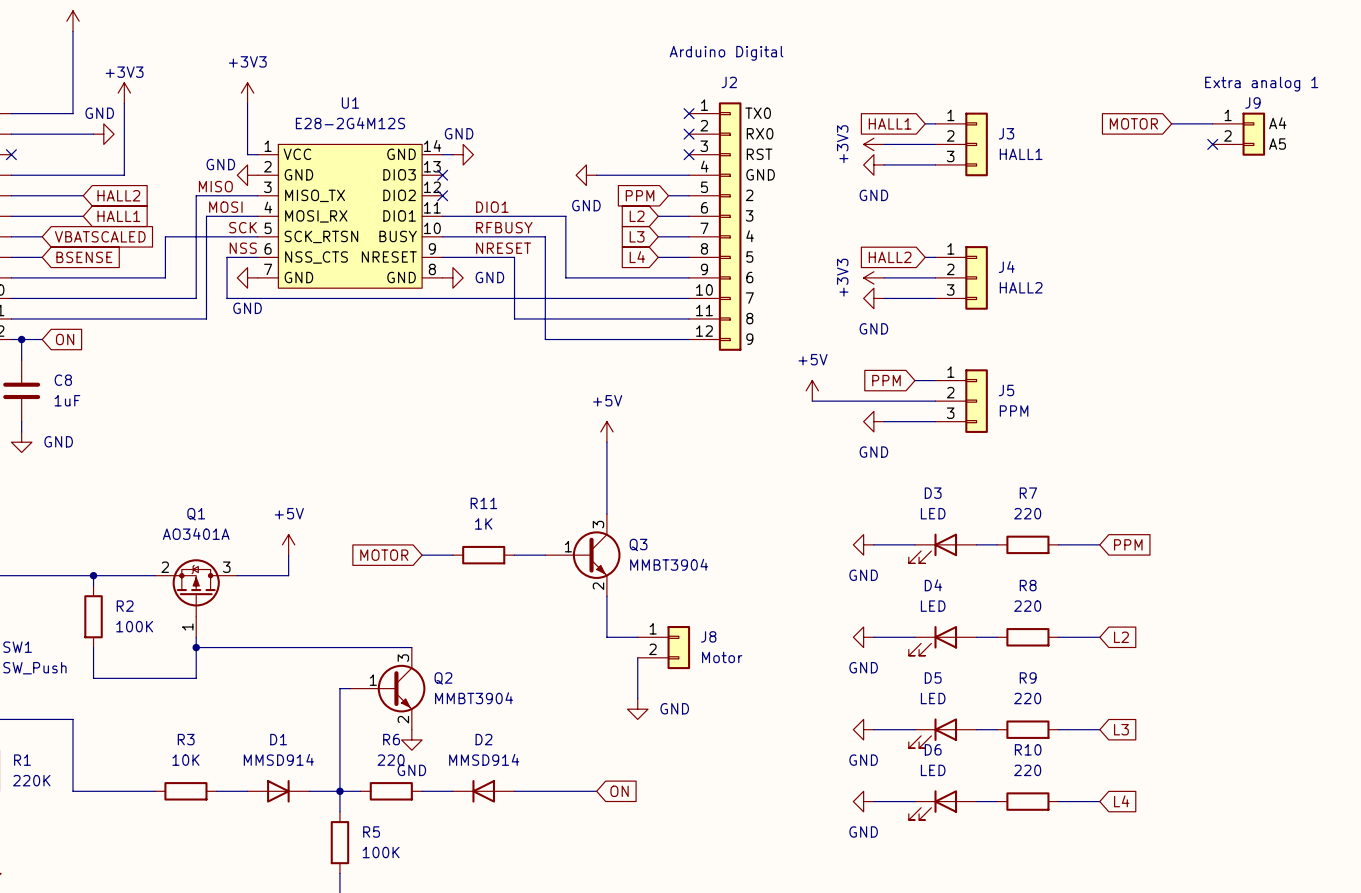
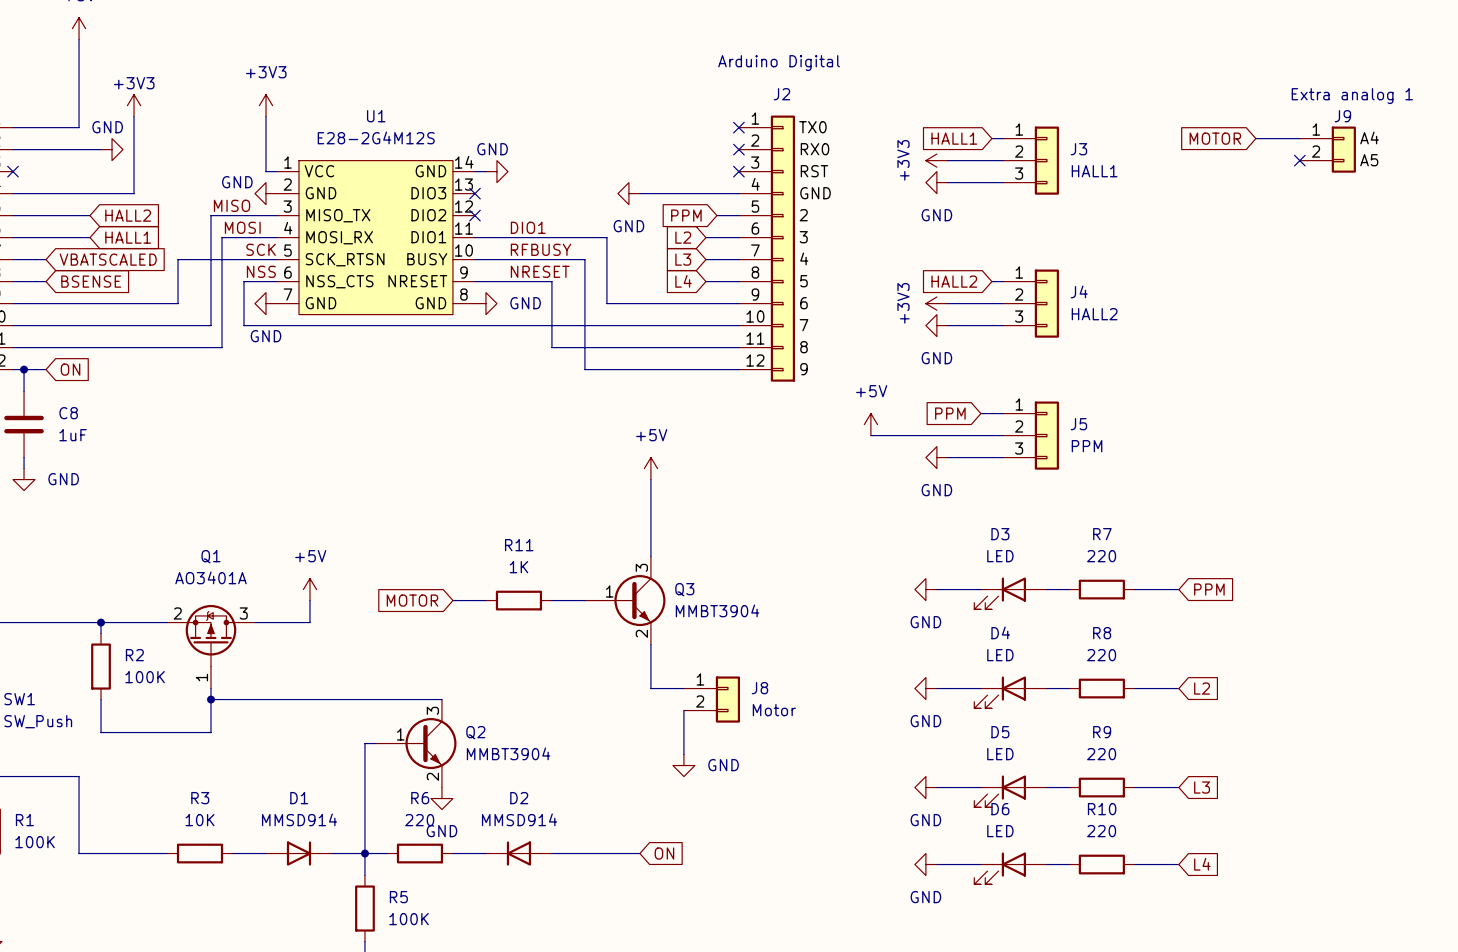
R1 value: 220K (31, 780) -> 100K (35, 842)

